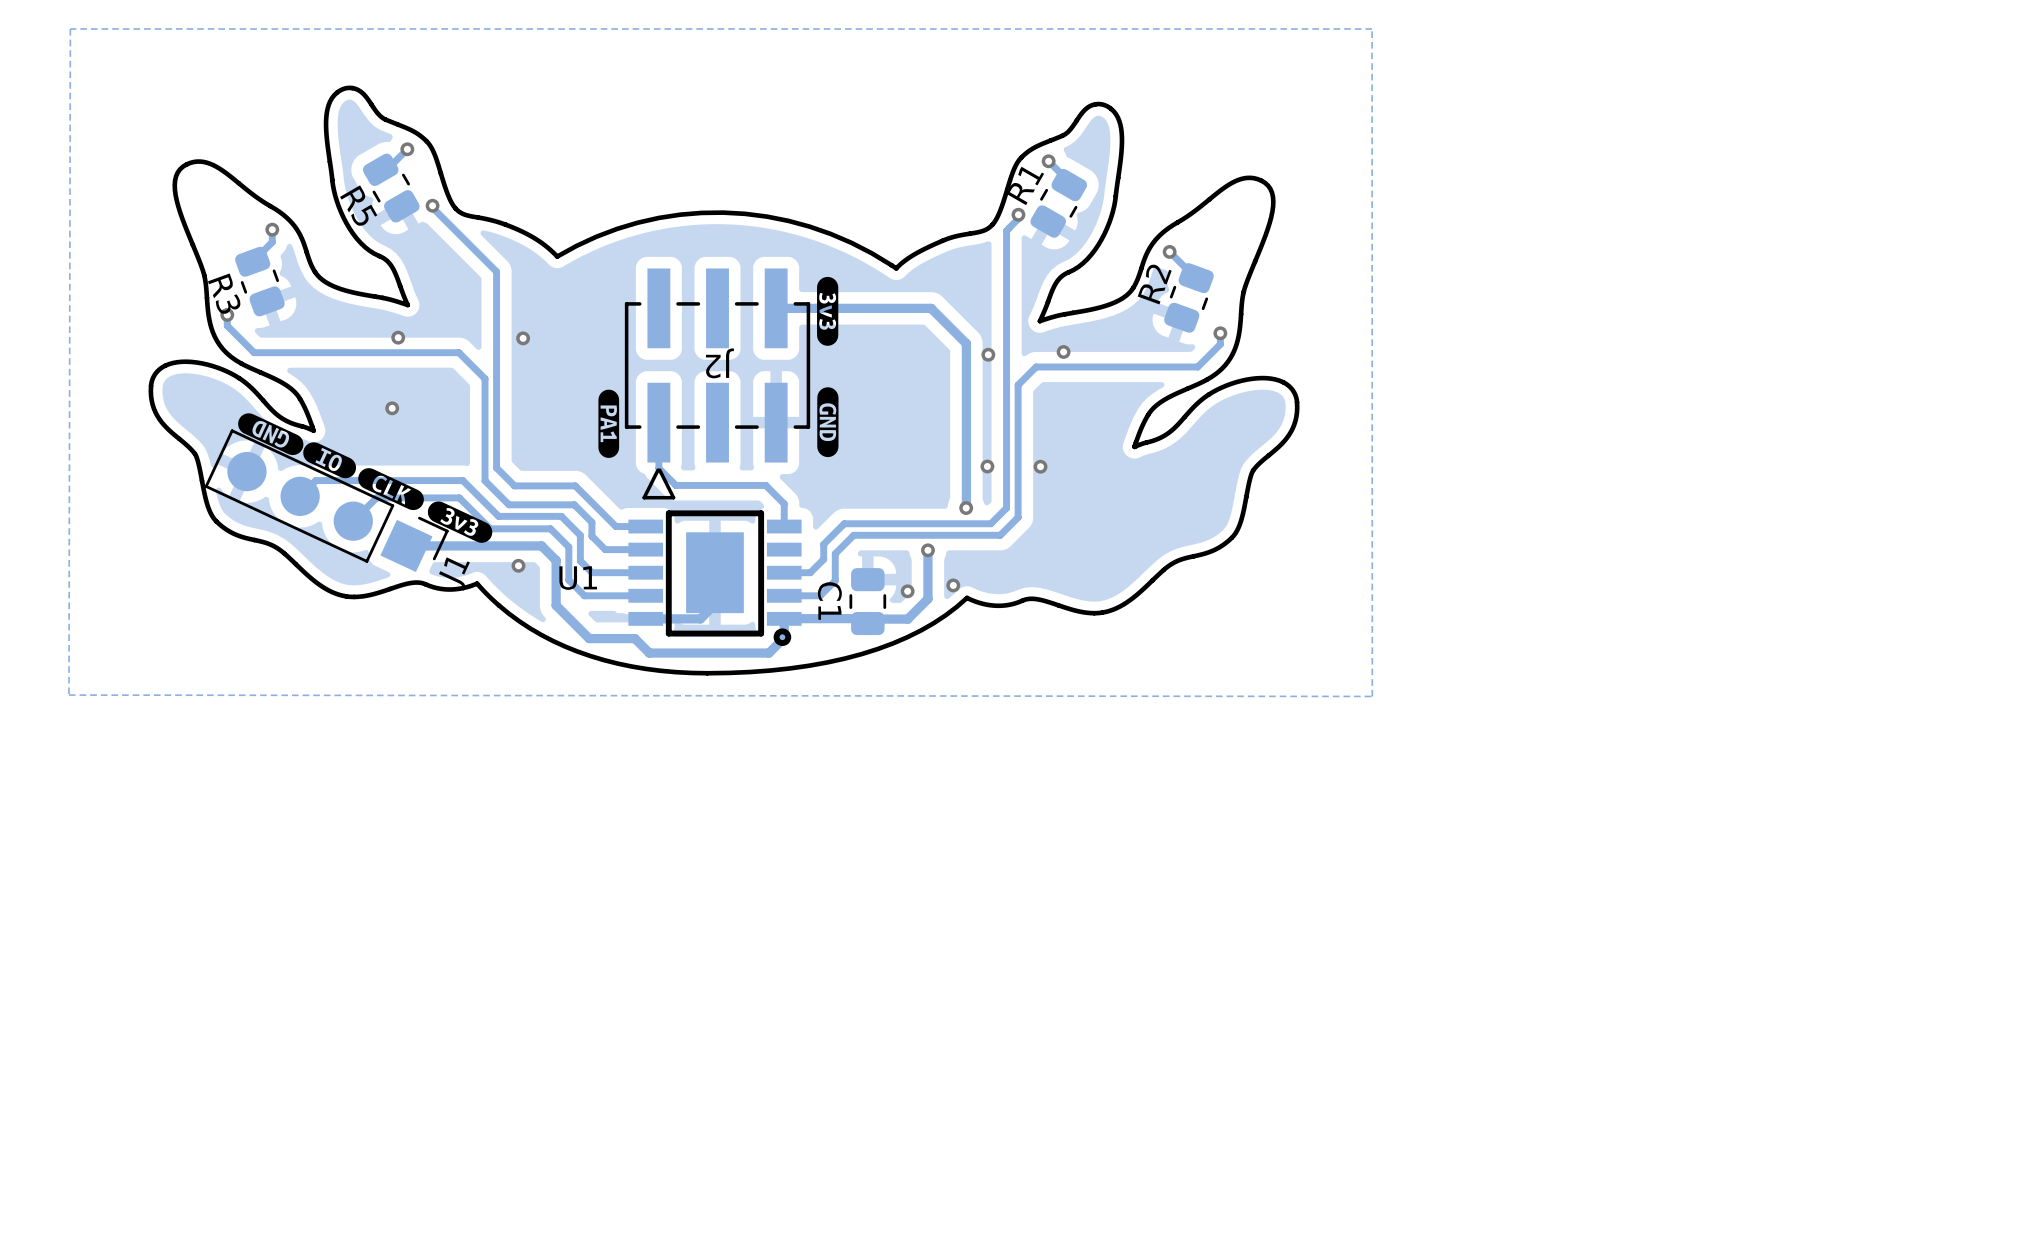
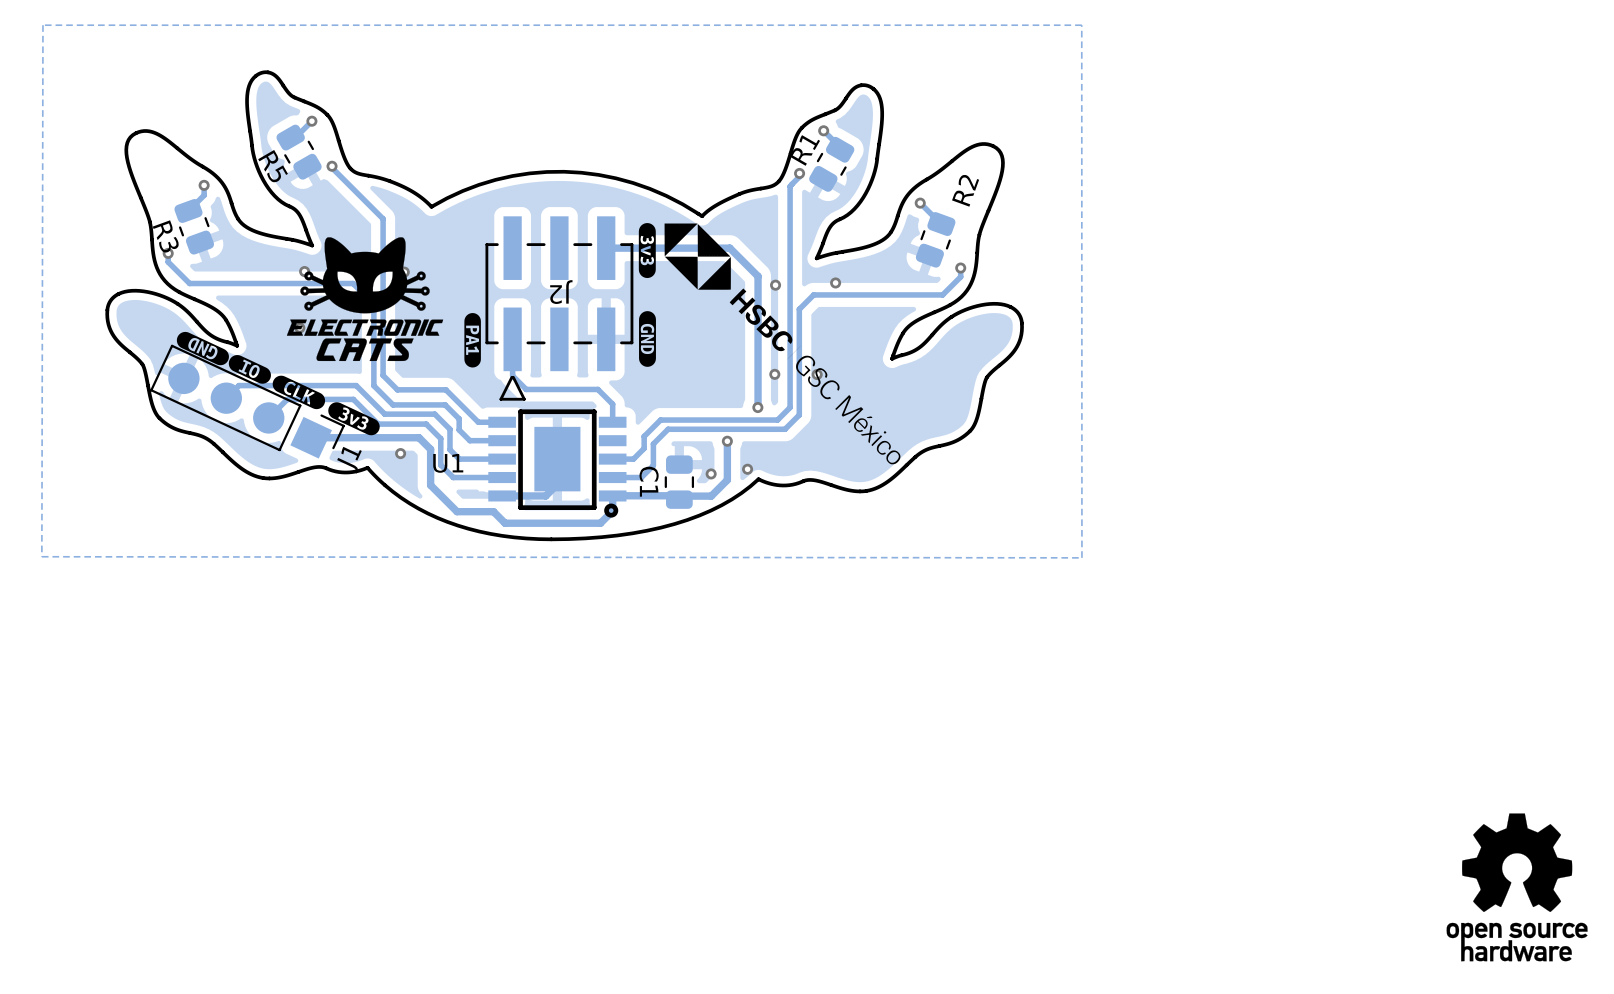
drawing: none -> [664, 223, 901, 465]
R2 name position: R2 (1154, 284) -> R2 (965, 190)
drawing: none -> [286, 237, 444, 362]
drawing: none -> [1446, 813, 1588, 962]

